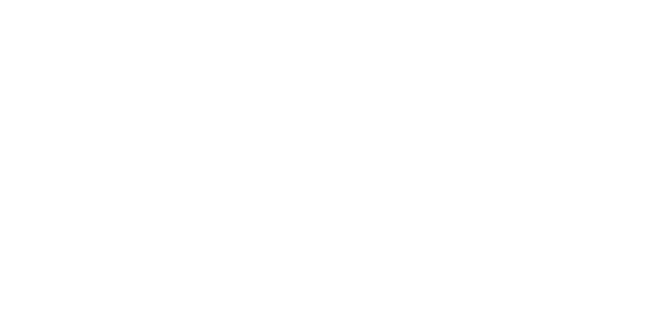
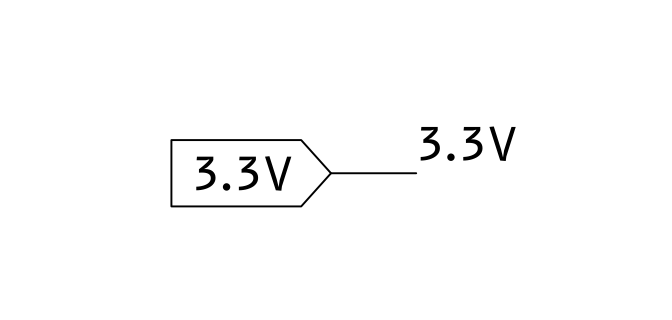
label: none -> 3.3V (468, 143)
global label: none -> 3.3V (243, 173)
wire: none -> (331, 173) (416, 173)

